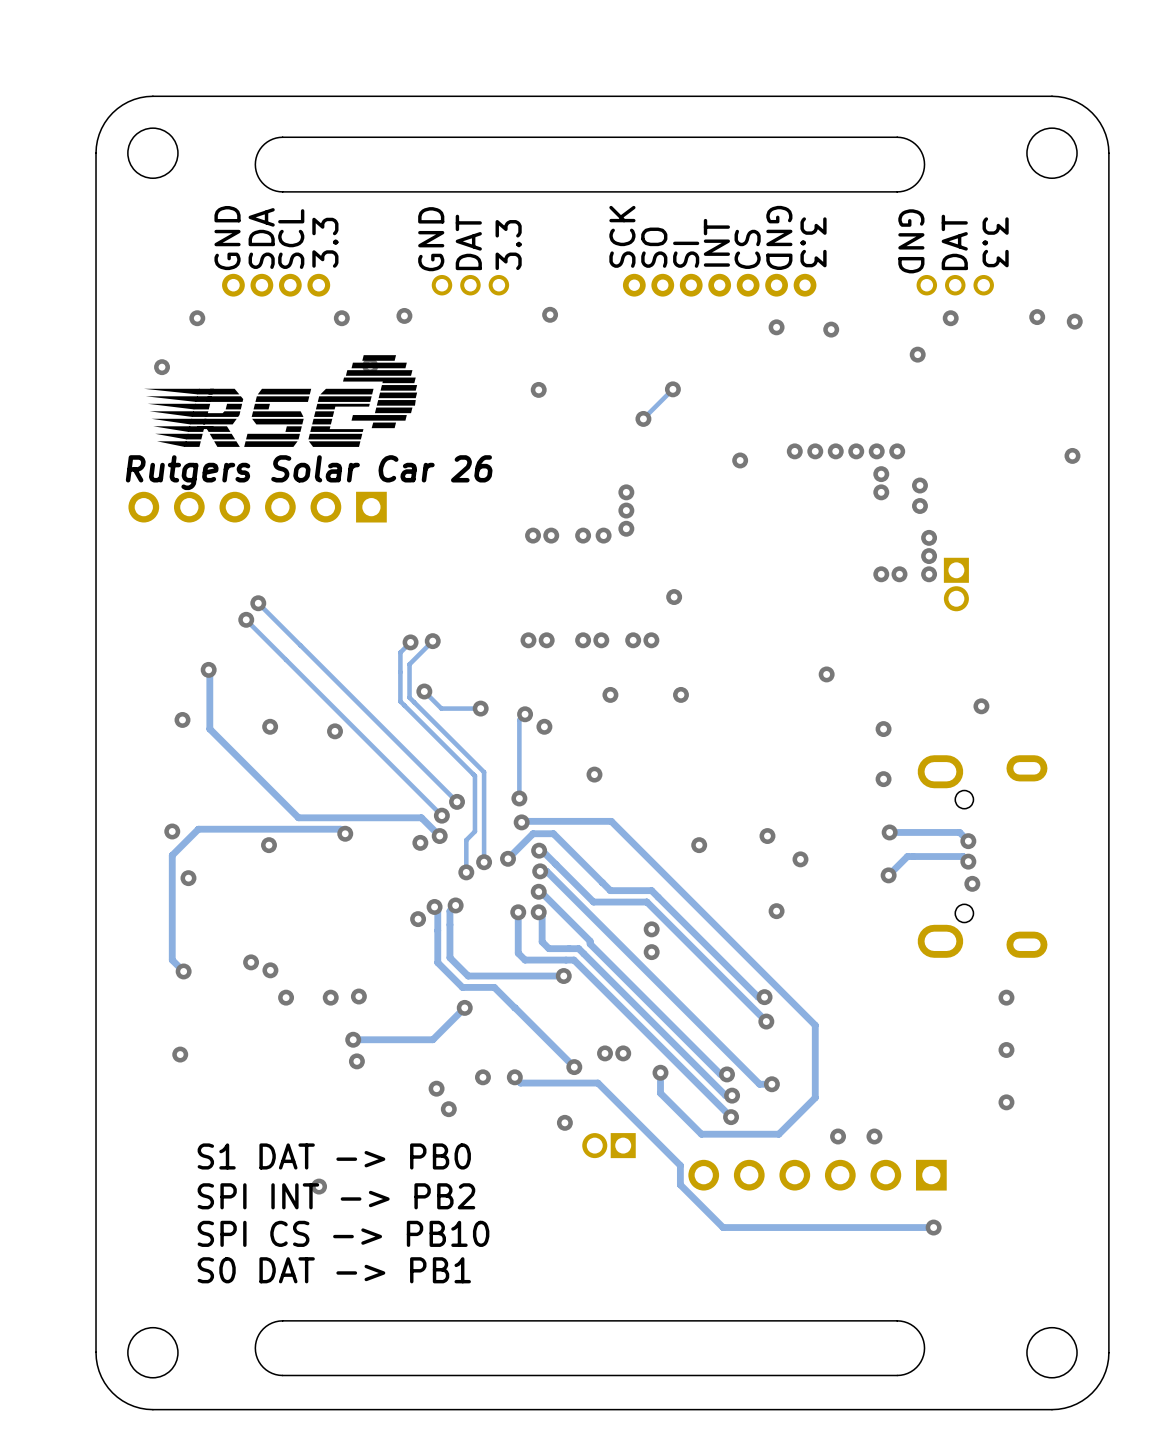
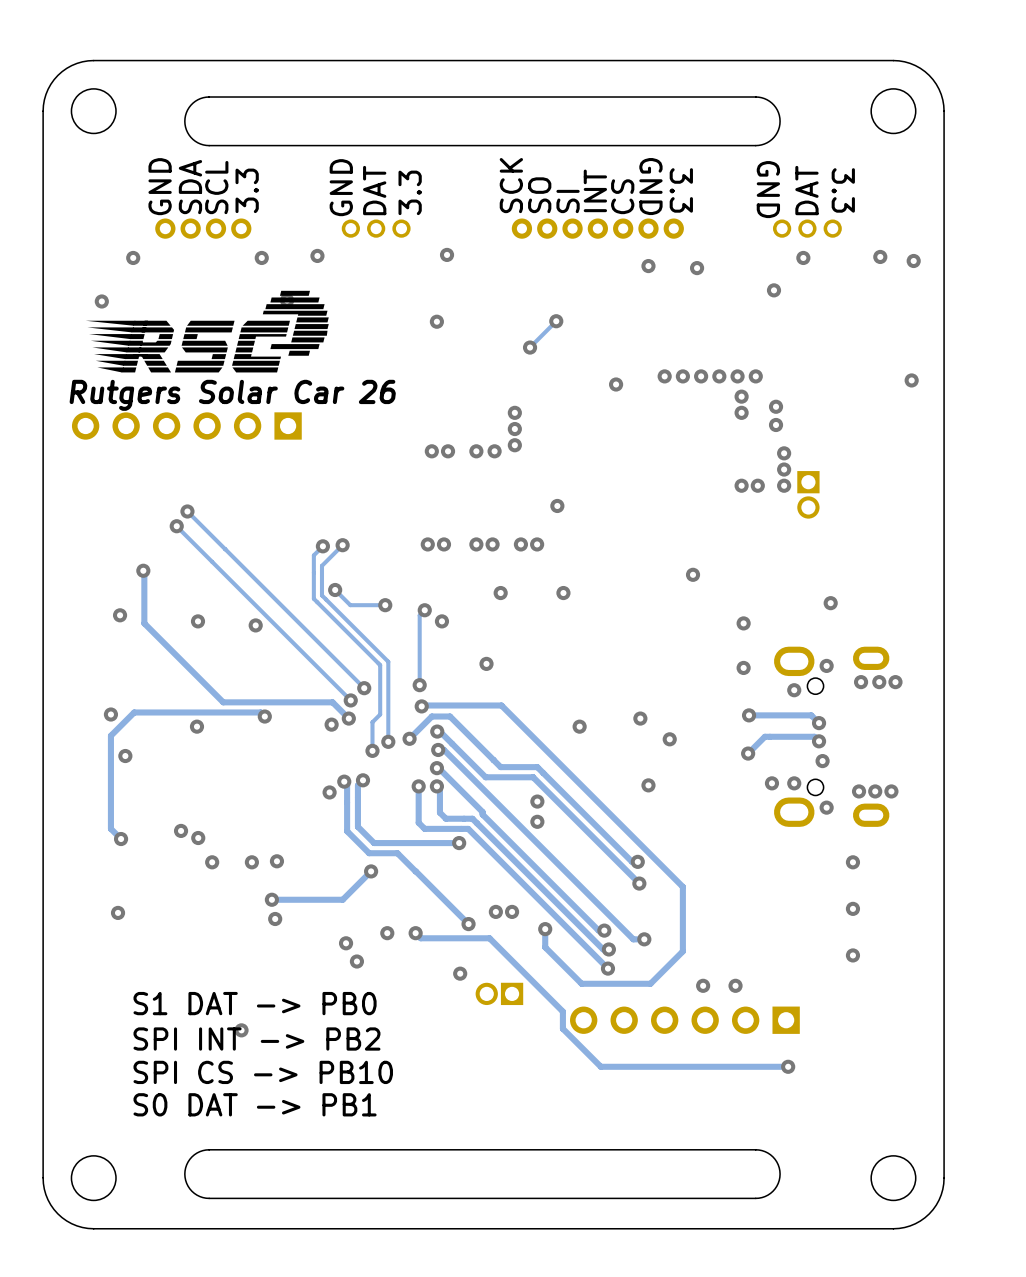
via: none -> (826, 665)
via: none -> (861, 682)
via: none -> (879, 682)
via: none -> (895, 682)
via: none -> (794, 690)
via: none -> (771, 783)
via: none -> (794, 783)
via: none -> (859, 791)
via: none -> (875, 791)
via: none -> (891, 791)
via: none -> (826, 807)

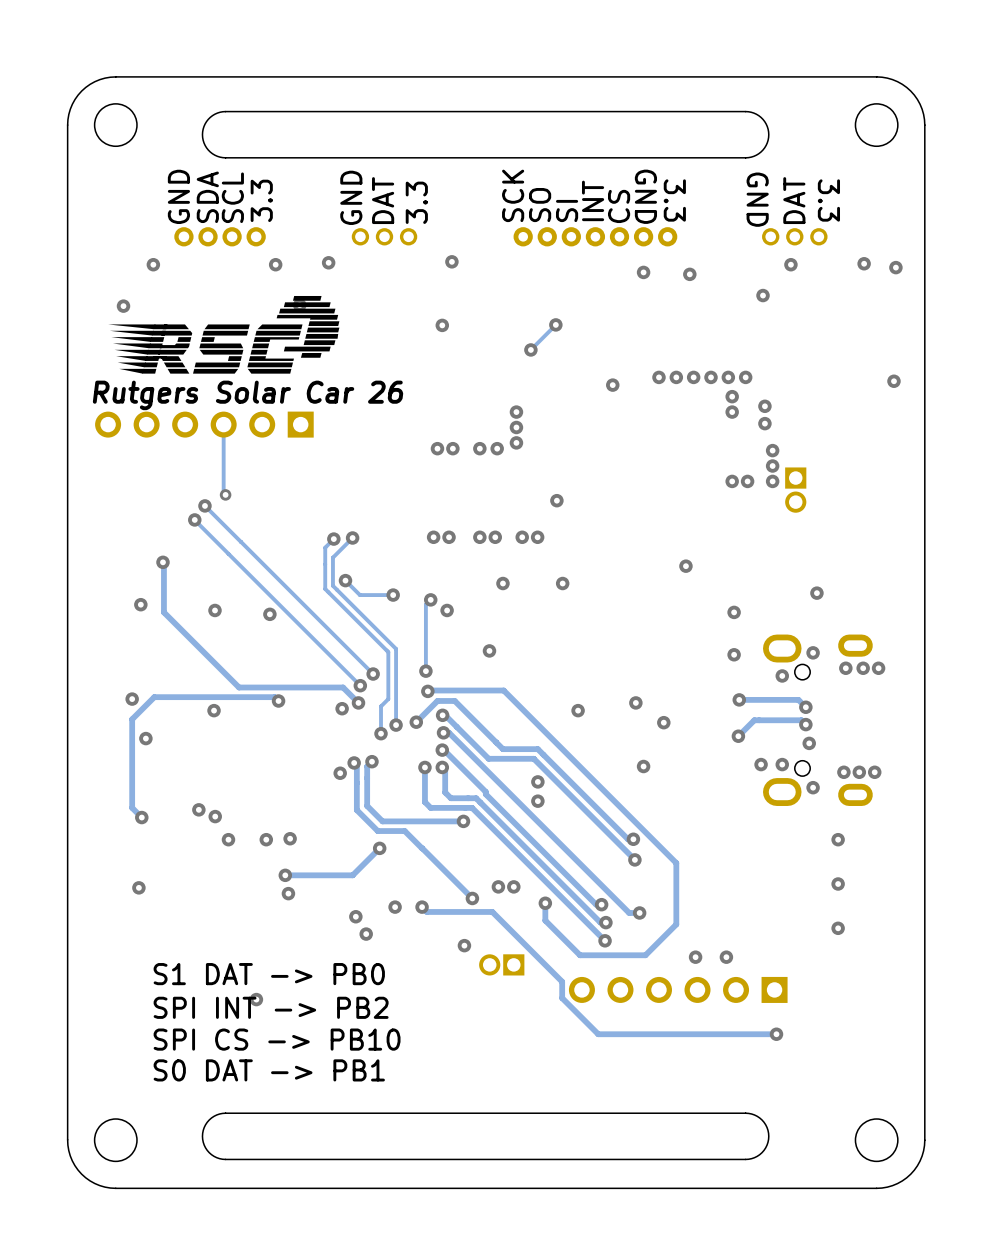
track: none -> (223, 424) (223, 492) (225, 494)
via: none -> (225, 494)

